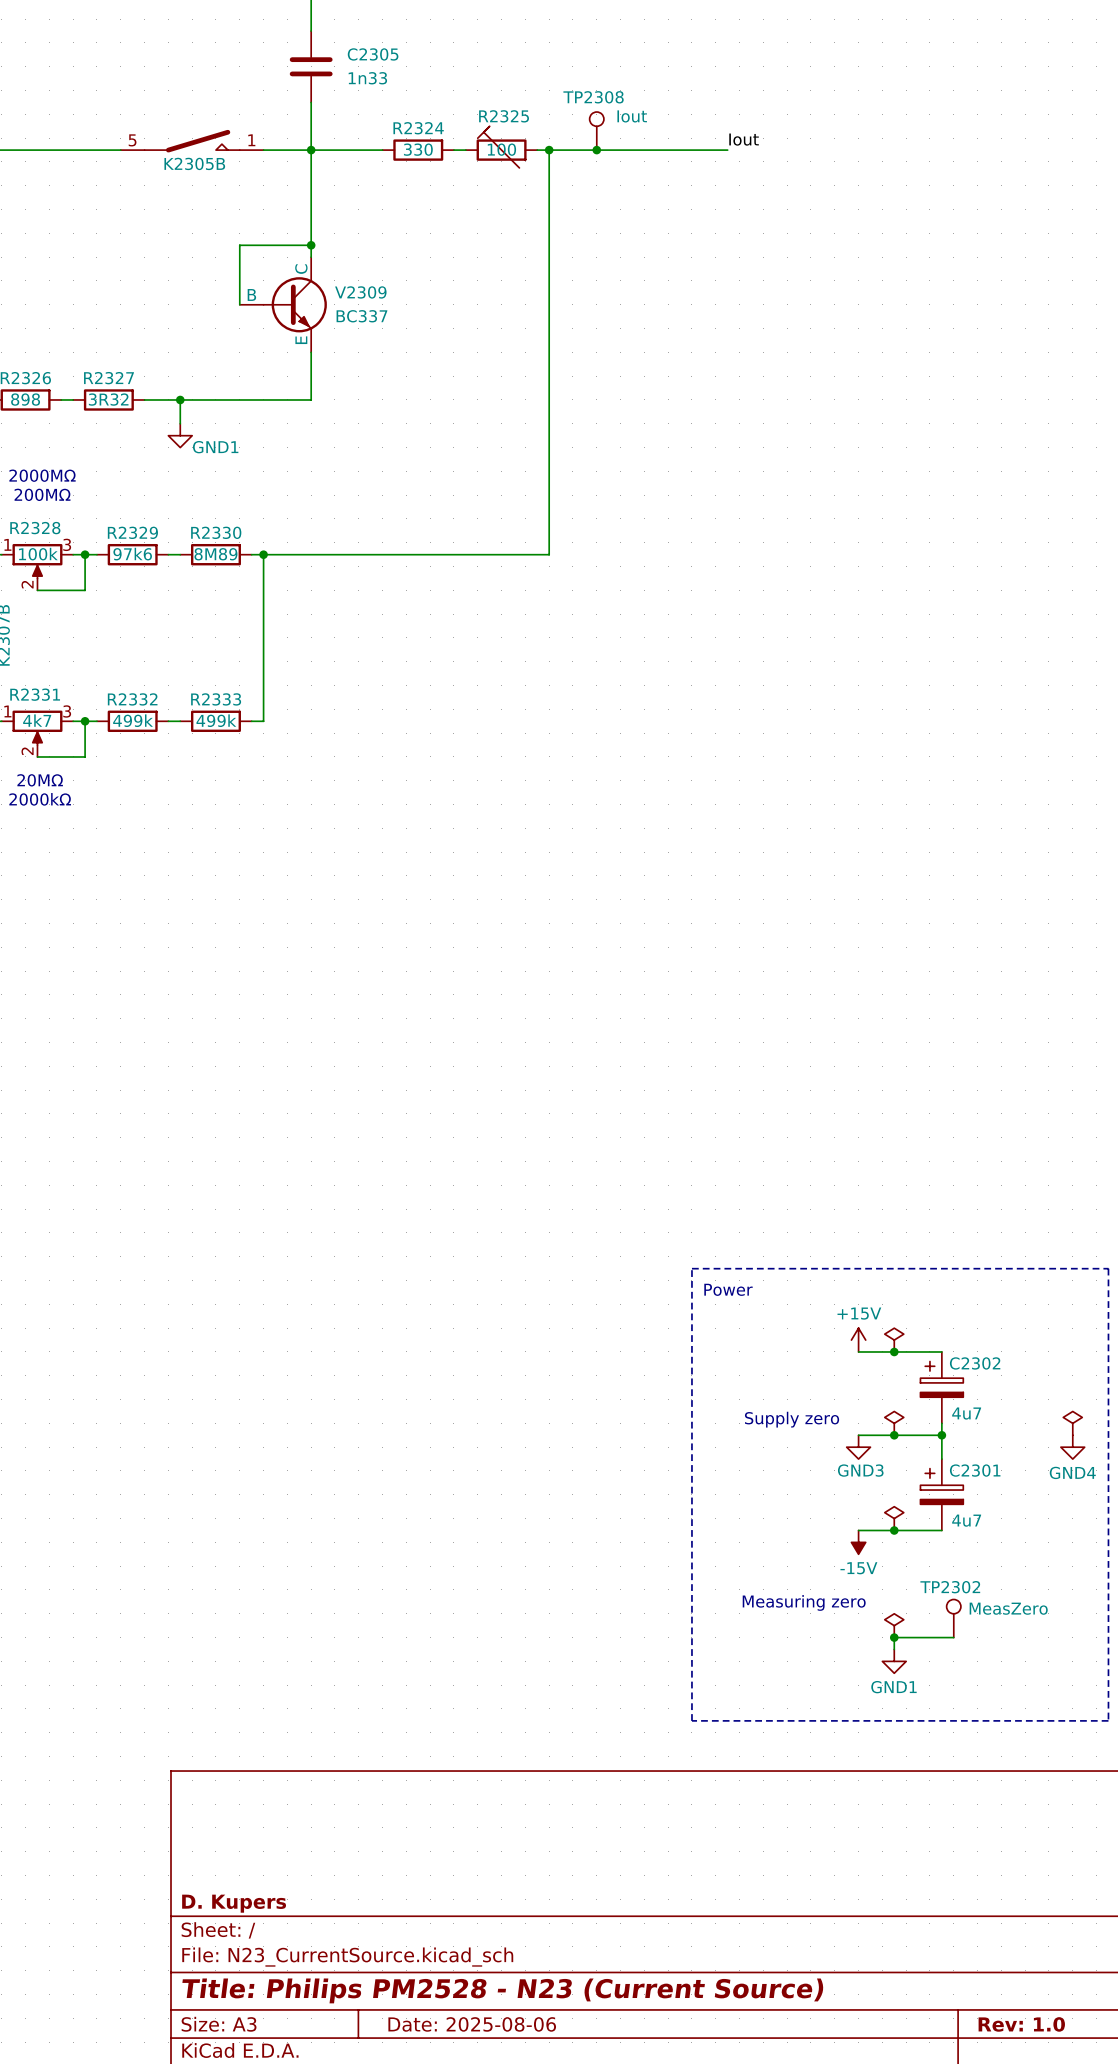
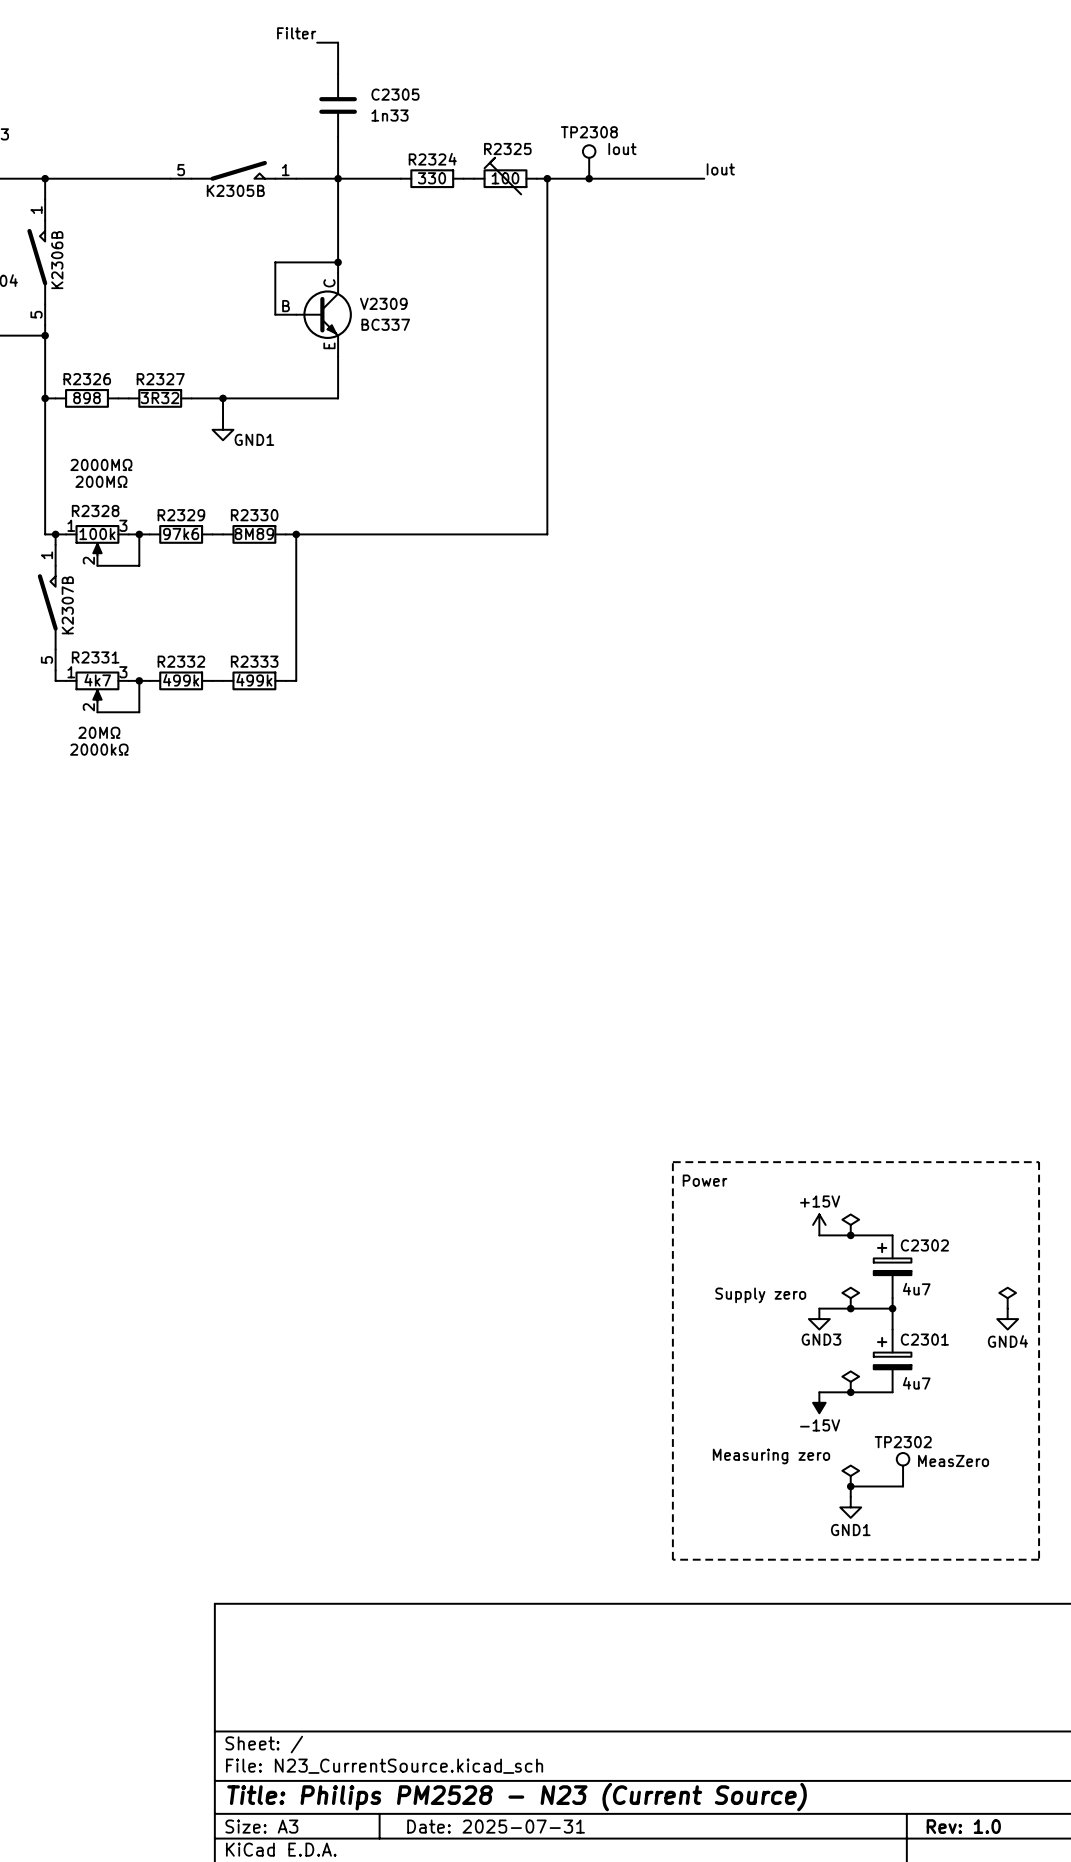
title block: D. Kupers (234, 1903) -> none
title block: Date: 2025-08-06 (472, 2024) -> Date: 2025-07-31 (496, 1826)

